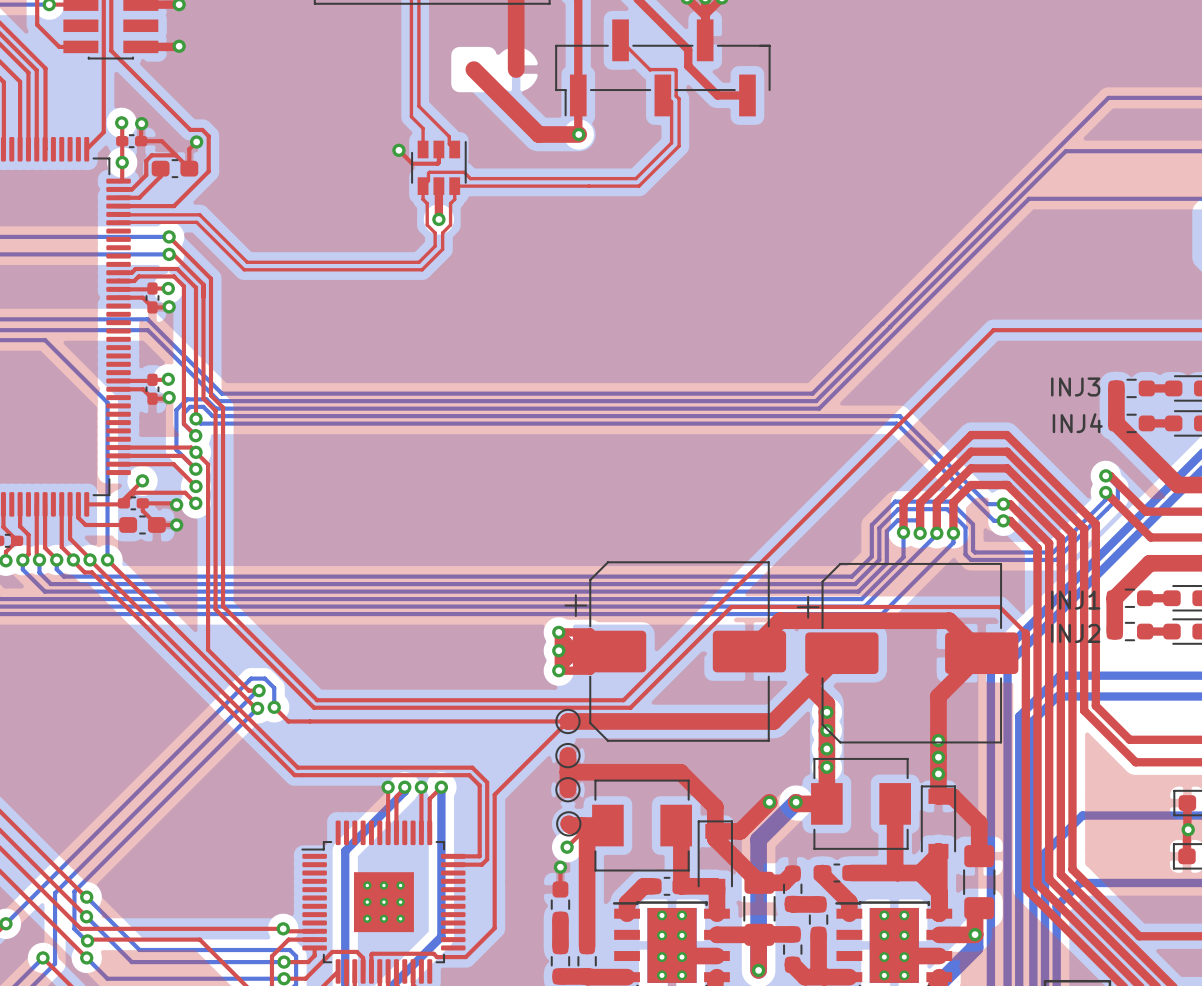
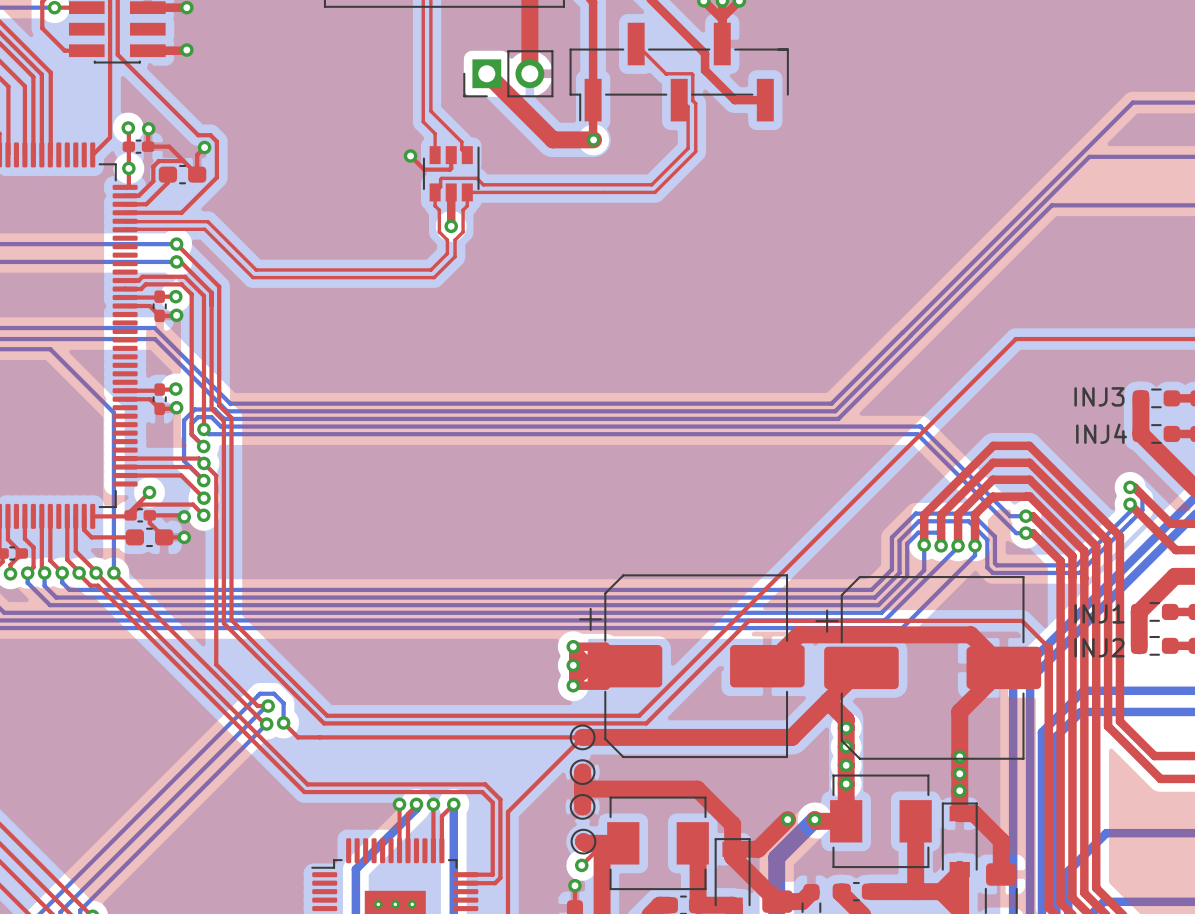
part: none -> (508, 73)

